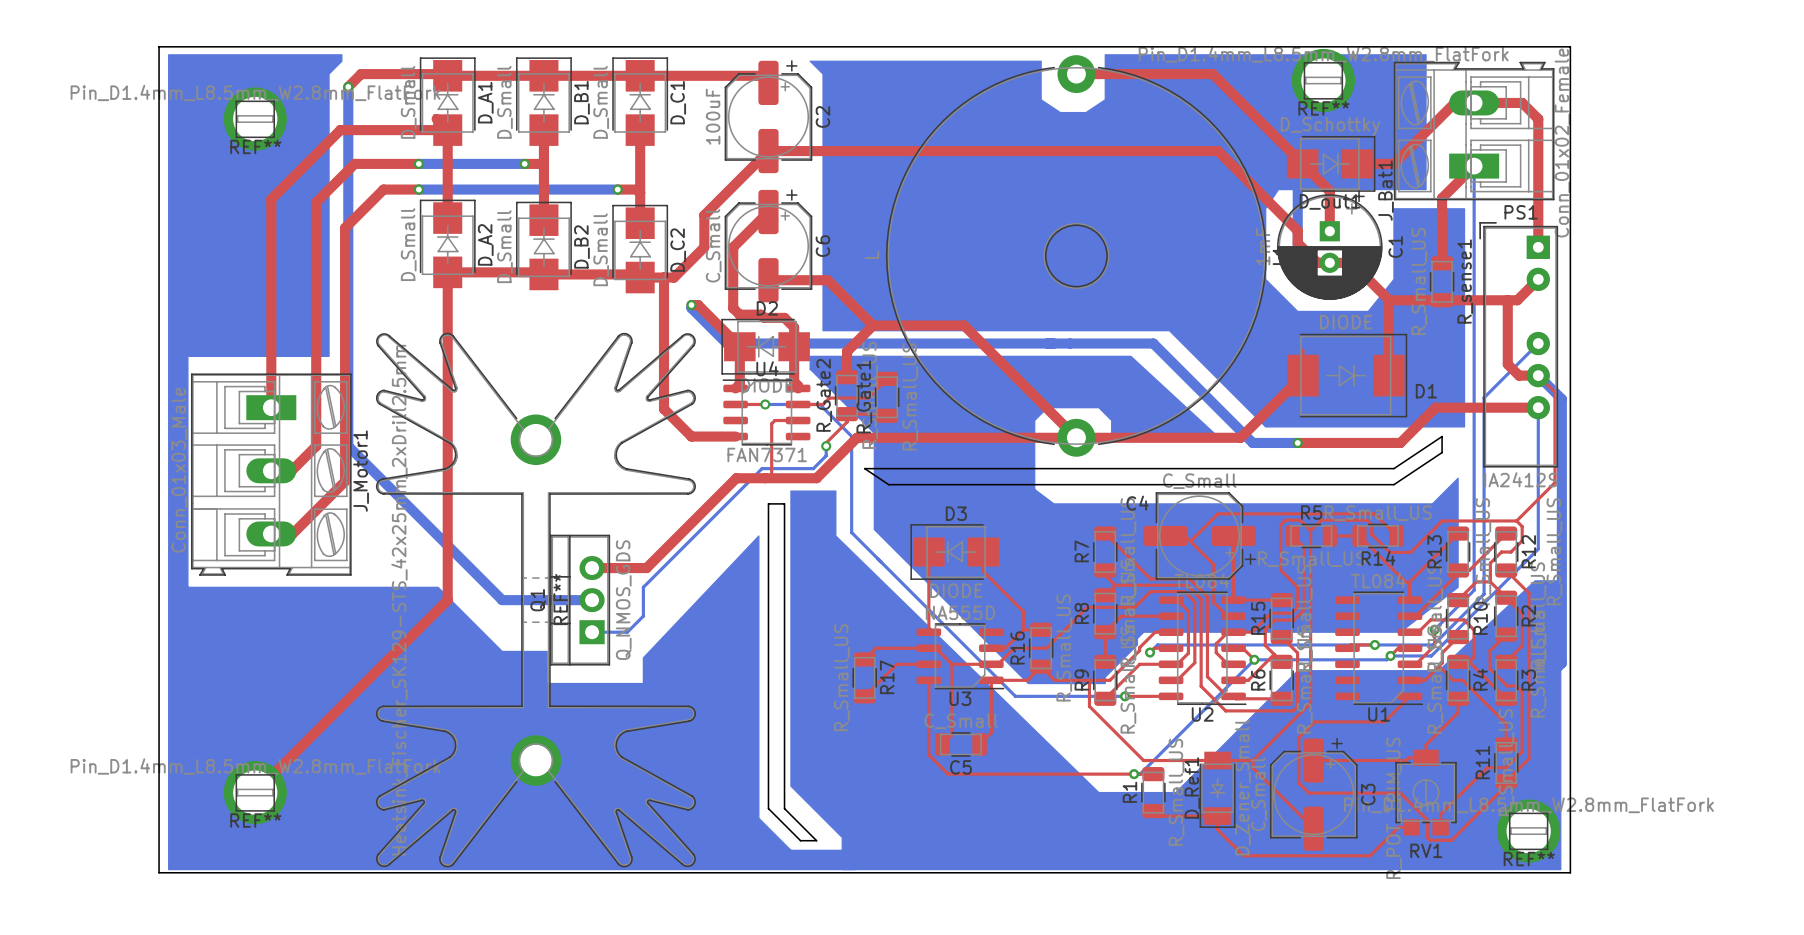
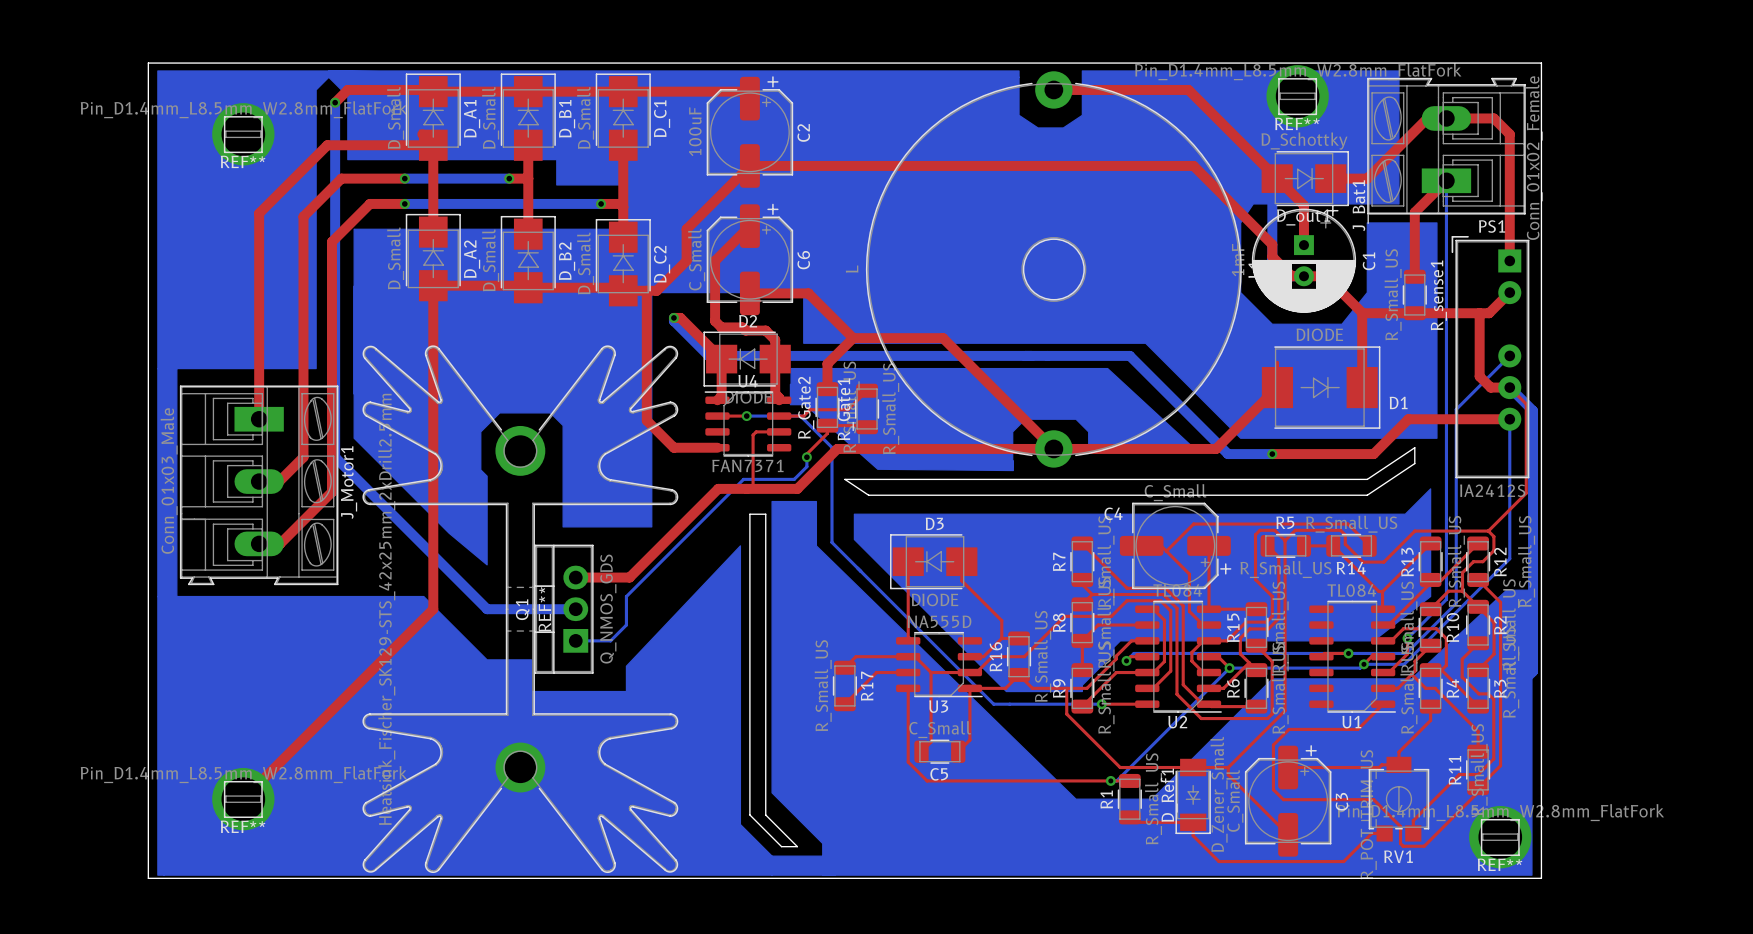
drawing: none -> [328, 70, 1191, 566]
drawing: [809, 355, 1459, 685] -> none
drawing: none -> [853, 488, 1432, 693]

